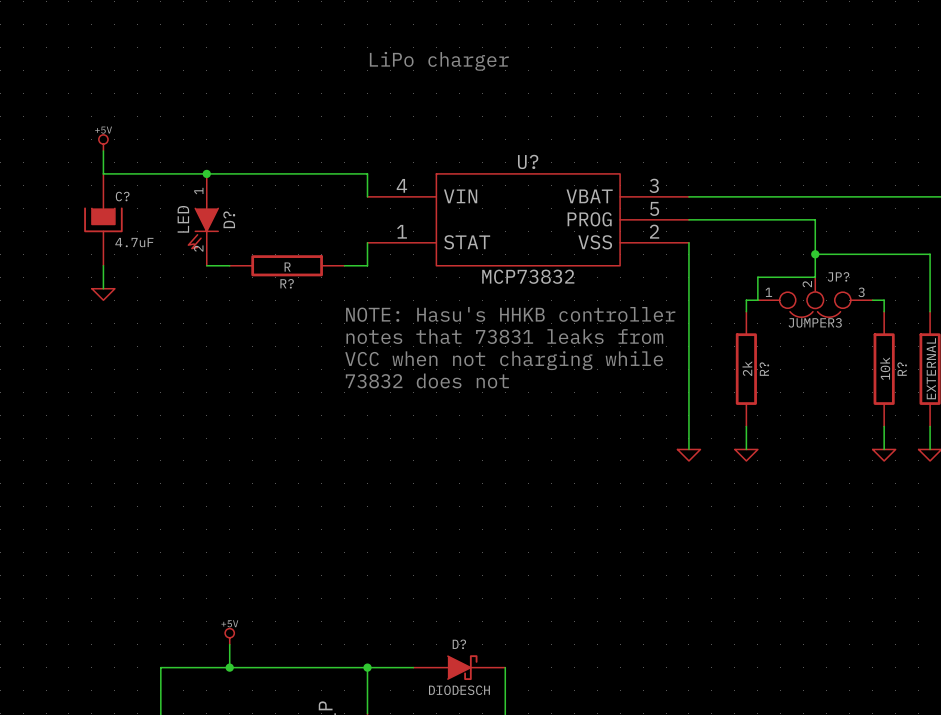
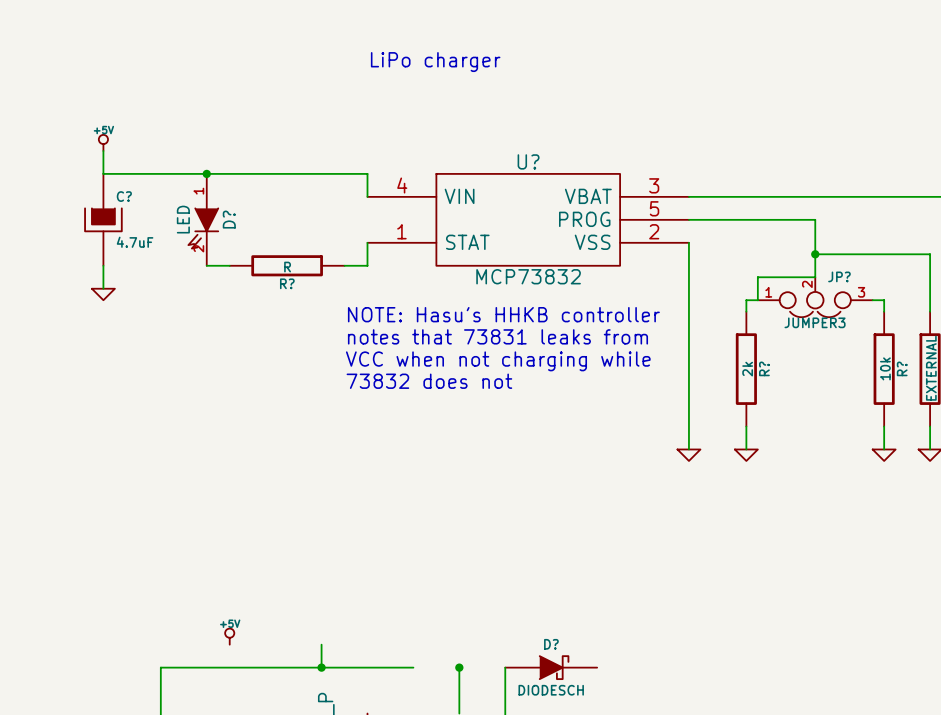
wire: (229, 644) (229, 667) -> (321, 644) (321, 667)
junction: (229, 667) -> none
junction: none -> (321, 667)
wire: (367, 667) (367, 713) -> (459, 667) (459, 713)
junction: (367, 667) -> none
D? position: (459, 667) -> (551, 667)
junction: none -> (459, 667)

